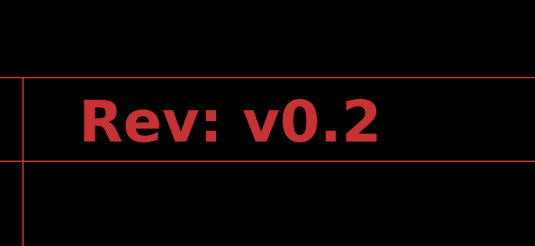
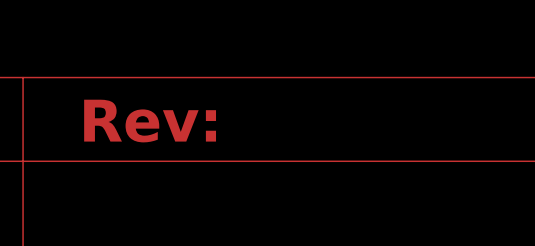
title block: Rev: v0.2 (230, 120) -> Rev: (150, 121)

